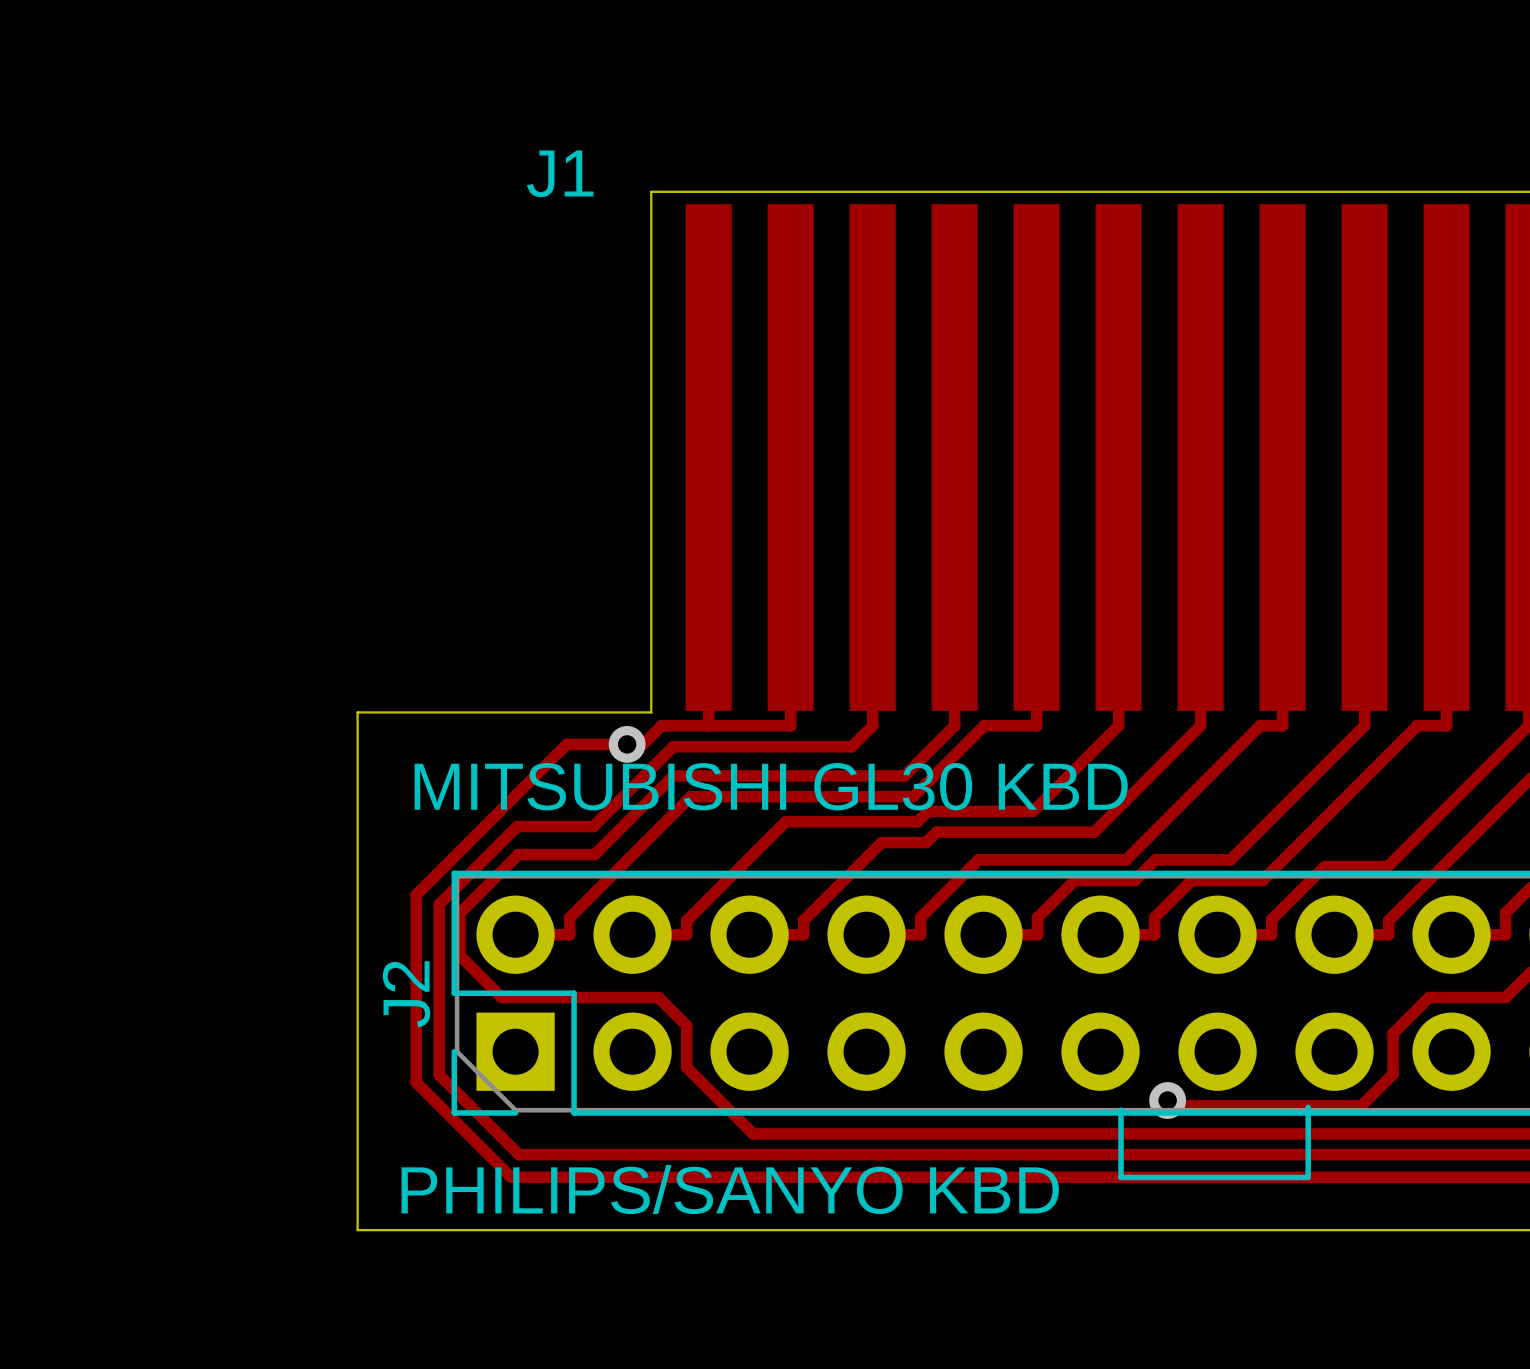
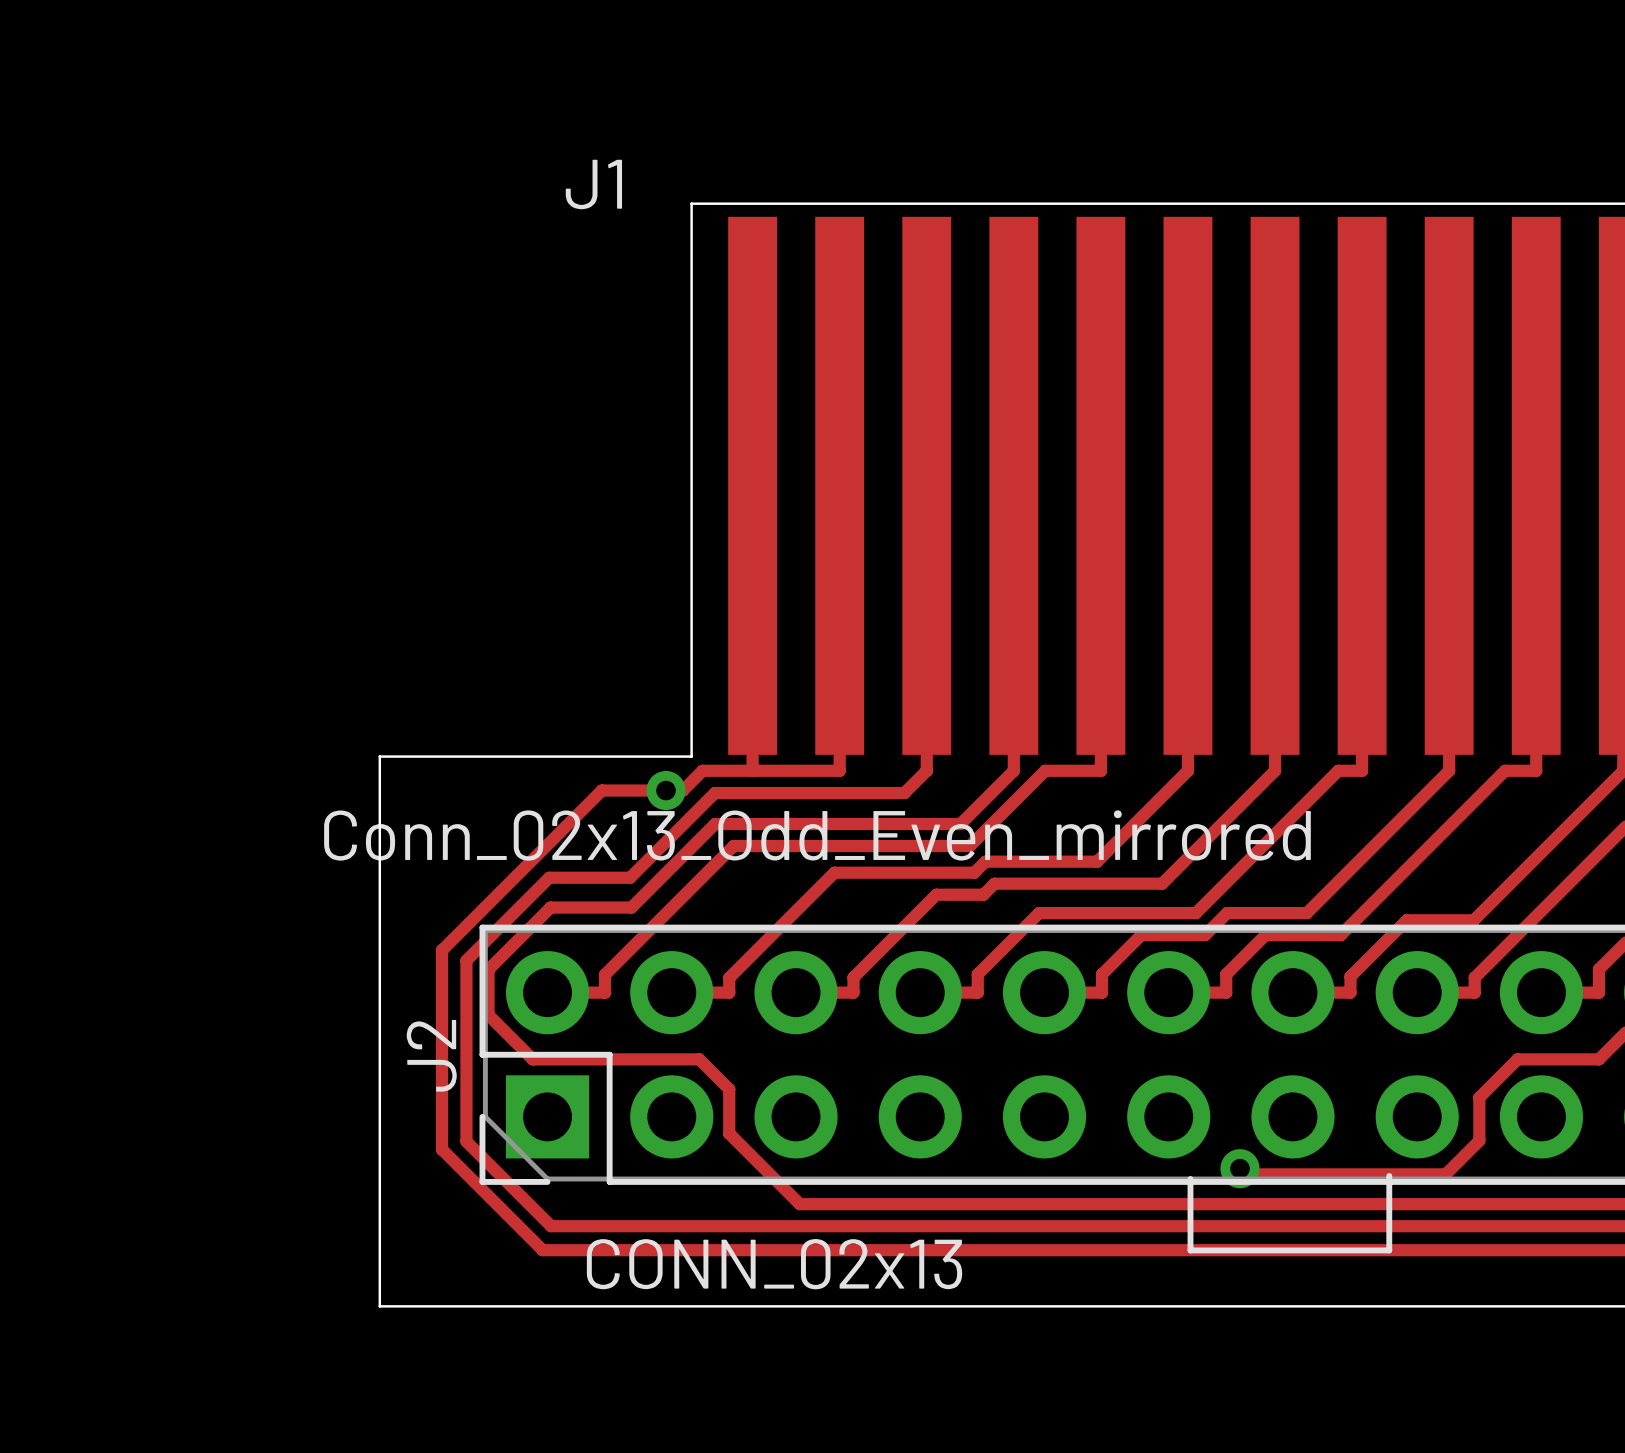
J1 value: MITSUBISHI GL30 KBD (771, 786) -> Conn_02x13_Odd_Even_mirrored (817, 835)
J2 value: PHILIPS/SANYO KBD (730, 1189) -> CONN_02x13 (774, 1264)

